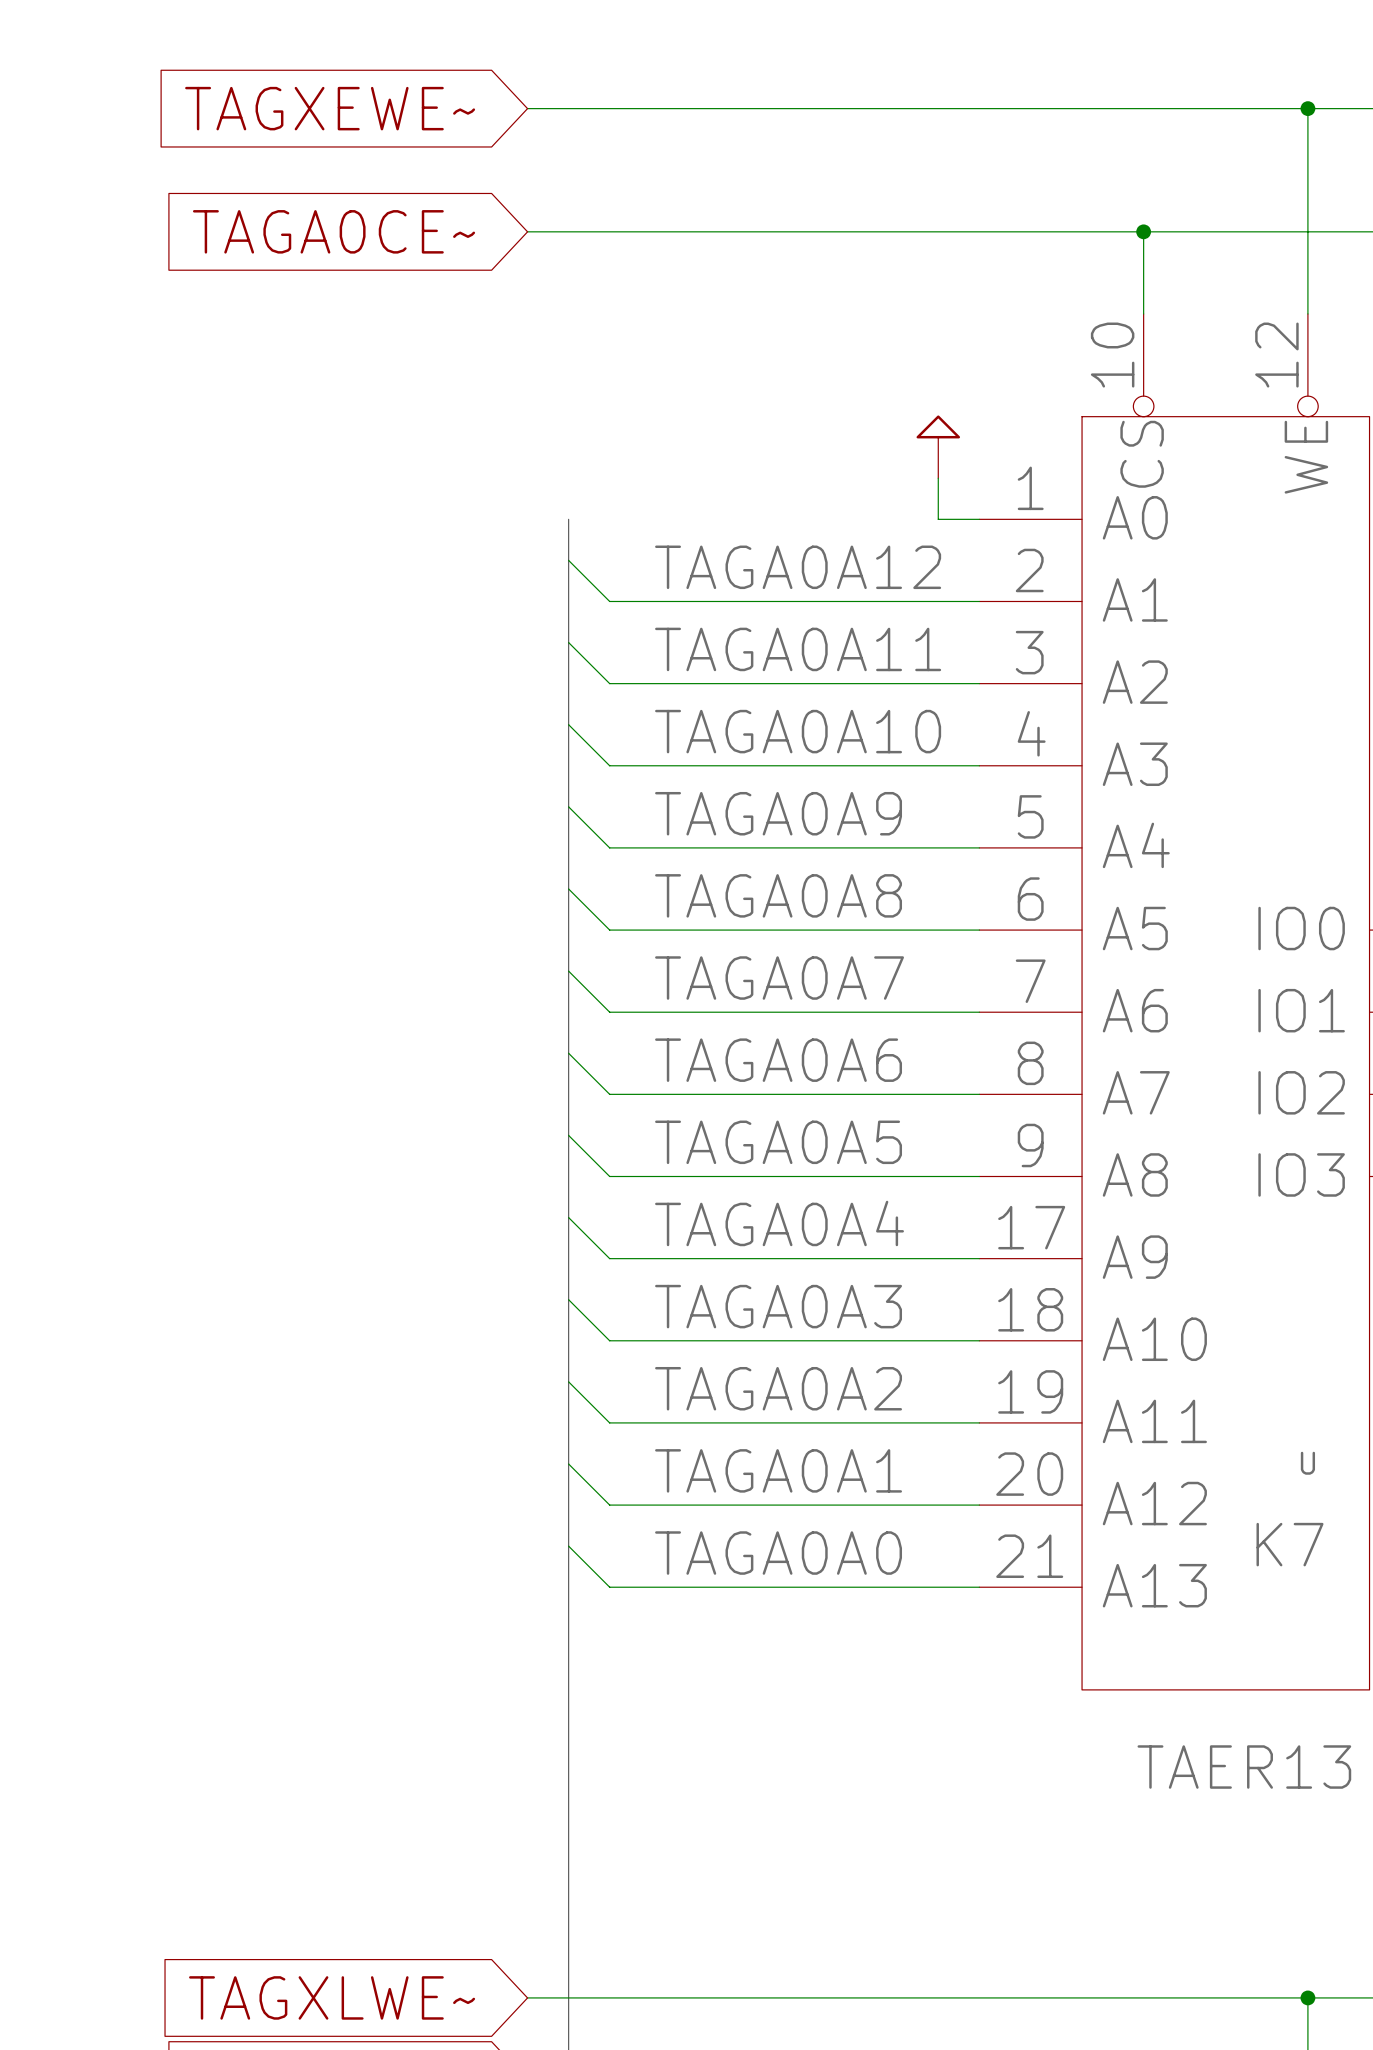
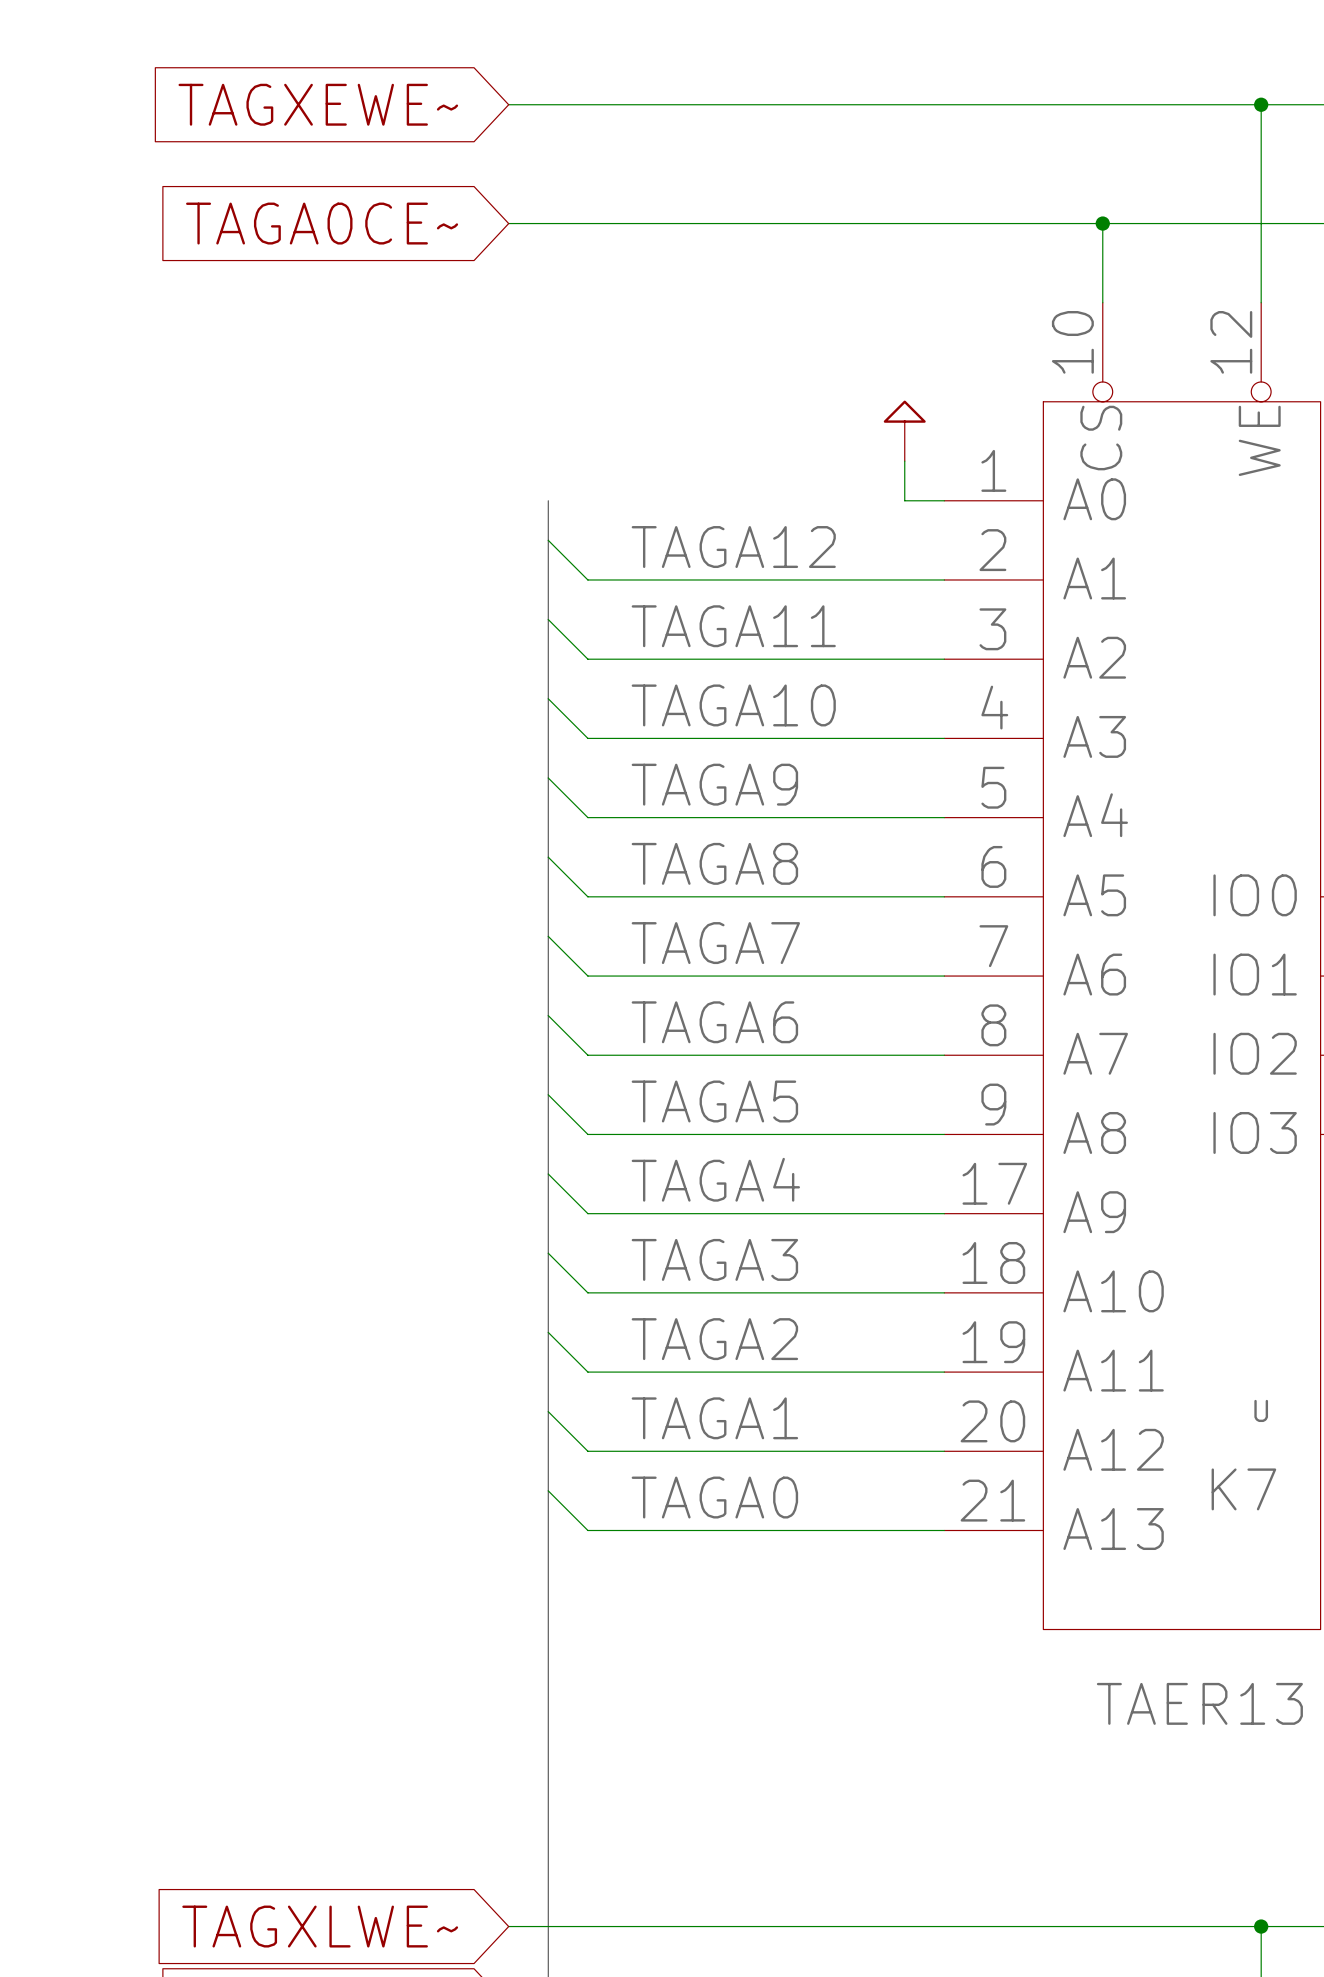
label: TAGA0A12 (798, 567) -> TAGA12 (733, 547)
label: TAGA0A11 (798, 649) -> TAGA11 (733, 626)
label: TAGA0A10 (798, 731) -> TAGA10 (733, 705)
label: TAGA0A9 (778, 813) -> TAGA9 (714, 784)
label: TAGA0A8 (778, 895) -> TAGA8 (714, 863)
label: TAGA0A7 (779, 978) -> TAGA7 (715, 943)
label: TAGA0A6 (778, 1060) -> TAGA6 (714, 1022)
label: TAGA0A5 (778, 1142) -> TAGA5 (714, 1101)
label: TAGA0A4 (779, 1223) -> TAGA4 (715, 1179)
label: TAGA0A3 (778, 1306) -> TAGA3 (714, 1259)
label: TAGA0A2 (778, 1388) -> TAGA2 (714, 1339)
label: TAGA0A1 (778, 1470) -> TAGA1 (714, 1418)
label: TAGA0A0 (778, 1553) -> TAGA0 (714, 1497)

